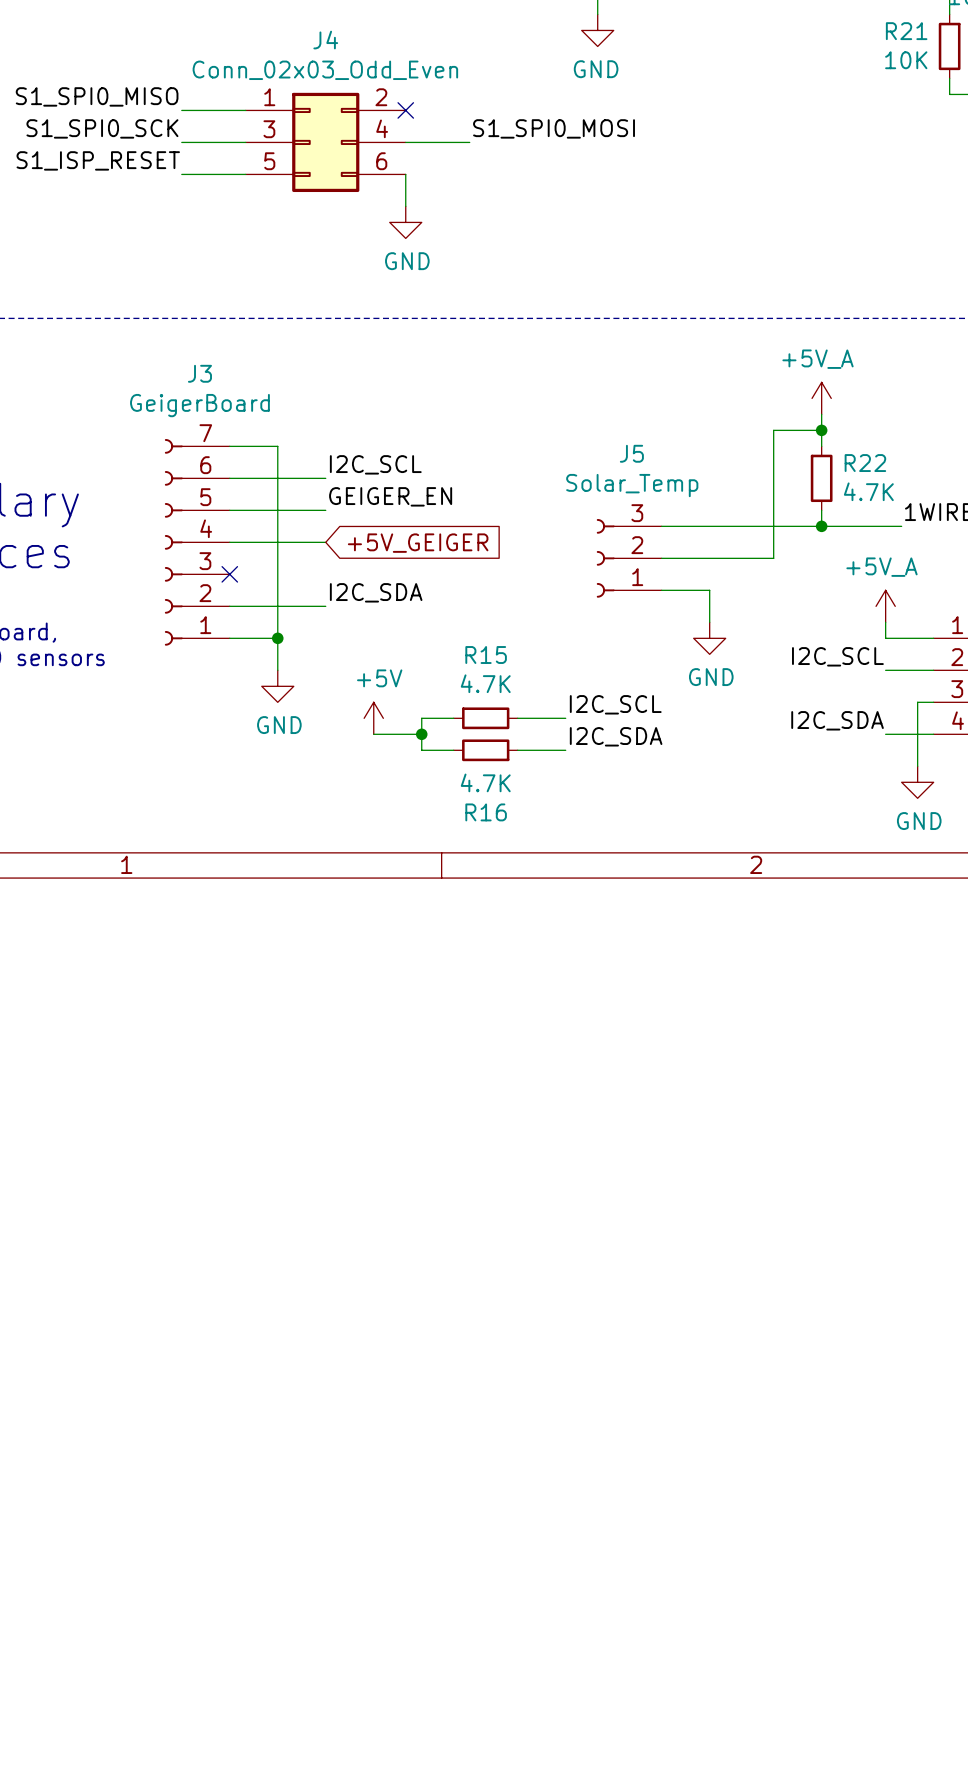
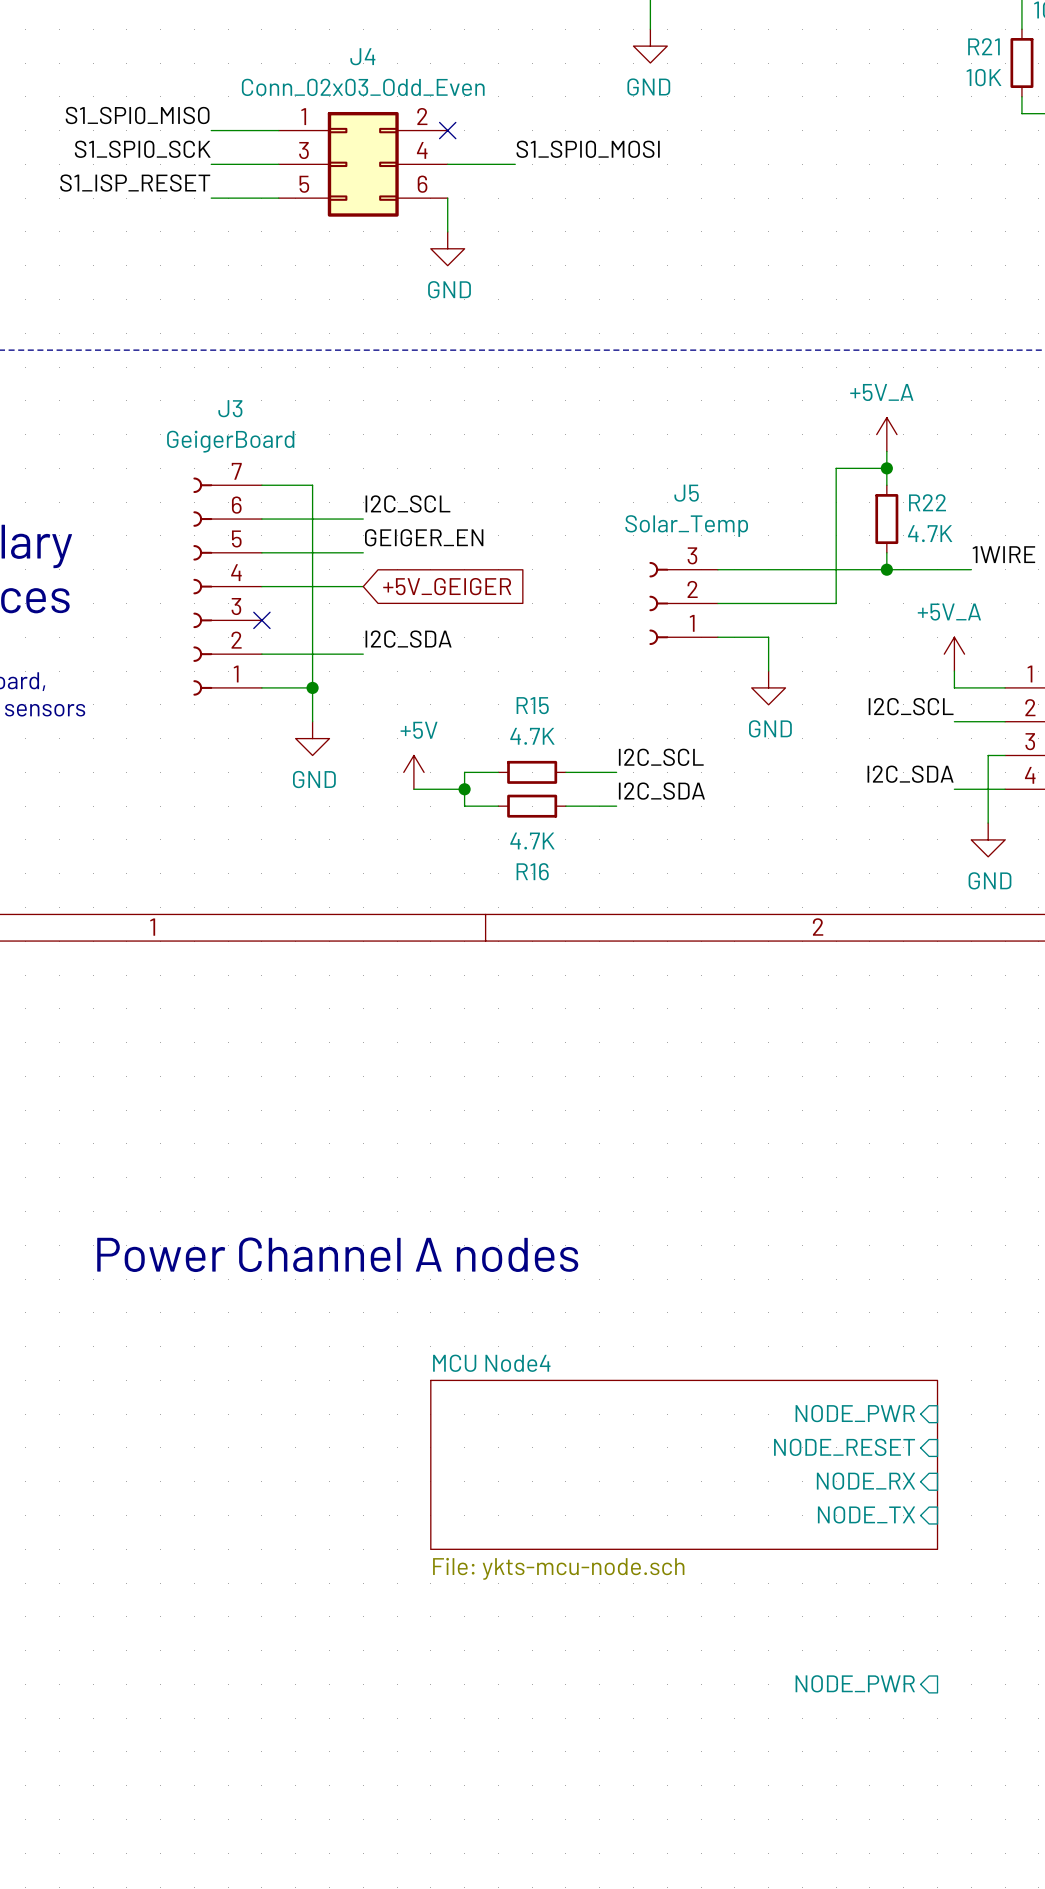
text: none -> Power Channel A nodes (337, 1254)
sheet pin: none -> NODE_PWR (855, 1413)
sheet pin: none -> NODE_RESET (844, 1447)
sheet MCU Node4: none -> File: ykts-mcu-node.sch (684, 1464)
sheet pin: none -> NODE_RX (865, 1481)
sheet pin: none -> NODE_TX (866, 1514)
sheet pin: none -> NODE_PWR (855, 1683)

